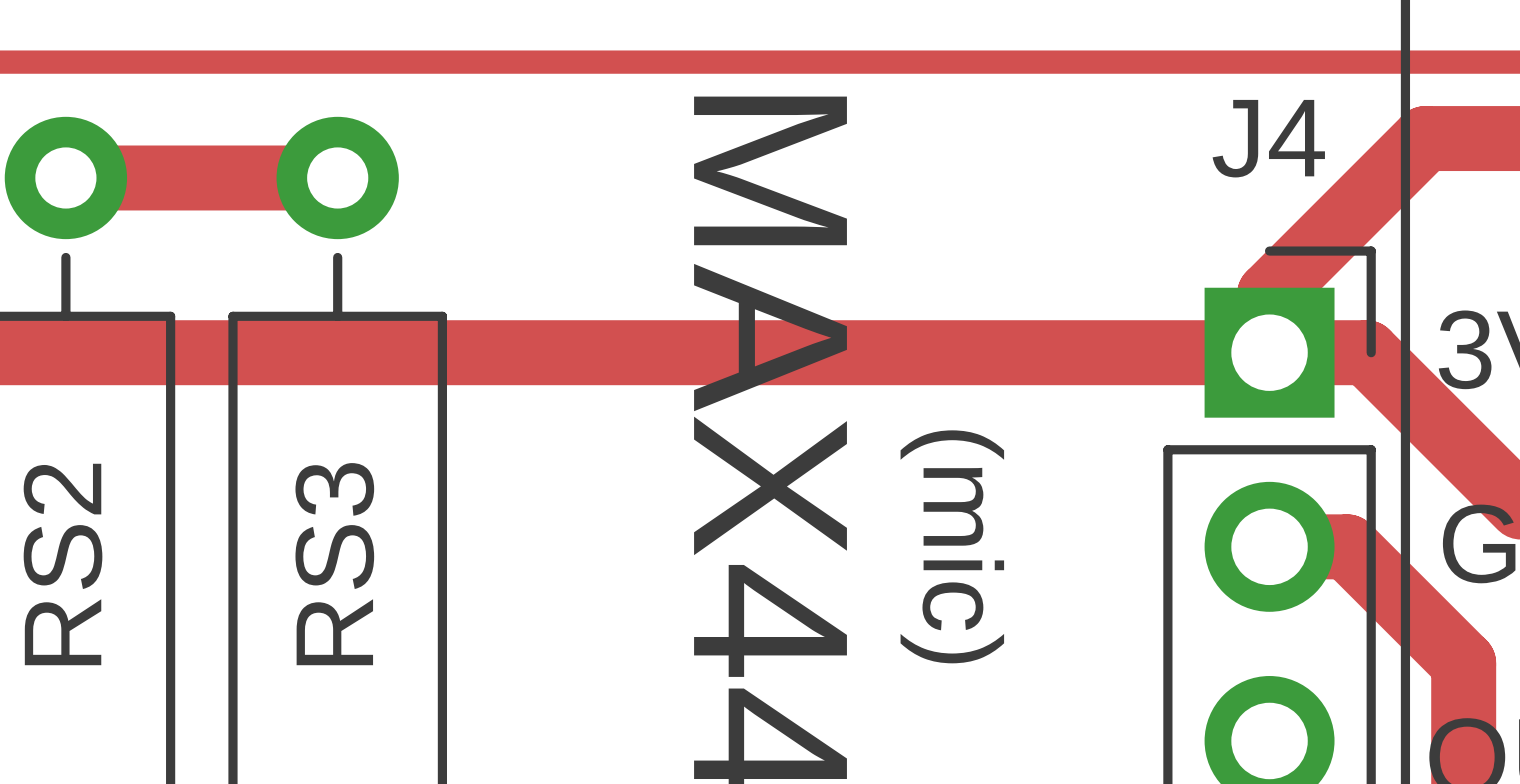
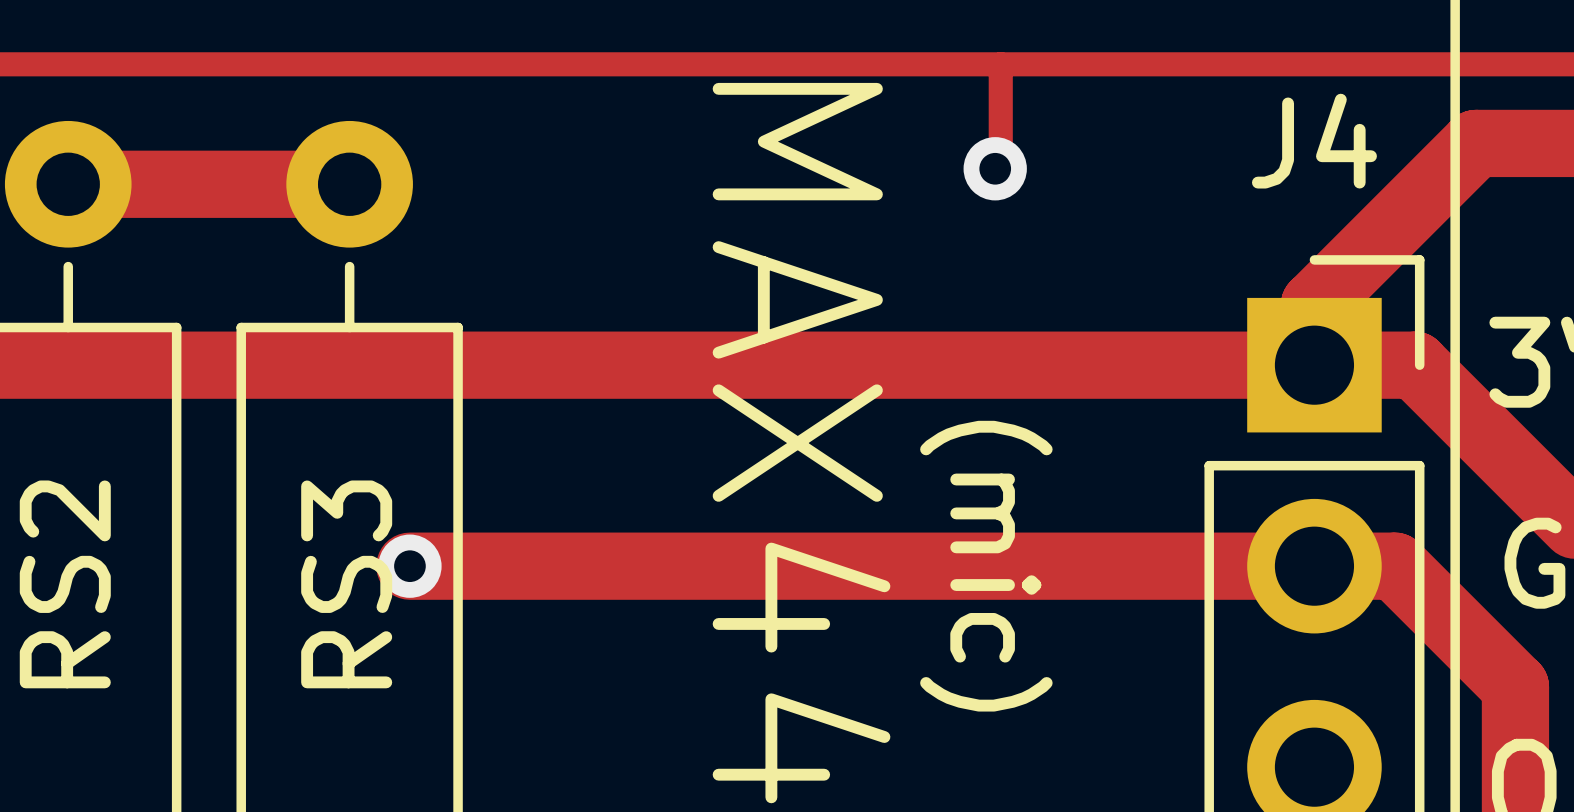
track: none -> (1000, 64) (1000, 163) (995, 168)
via: none -> (995, 168)
track: none -> (409, 566) (1314, 566)
via: none -> (409, 566)

